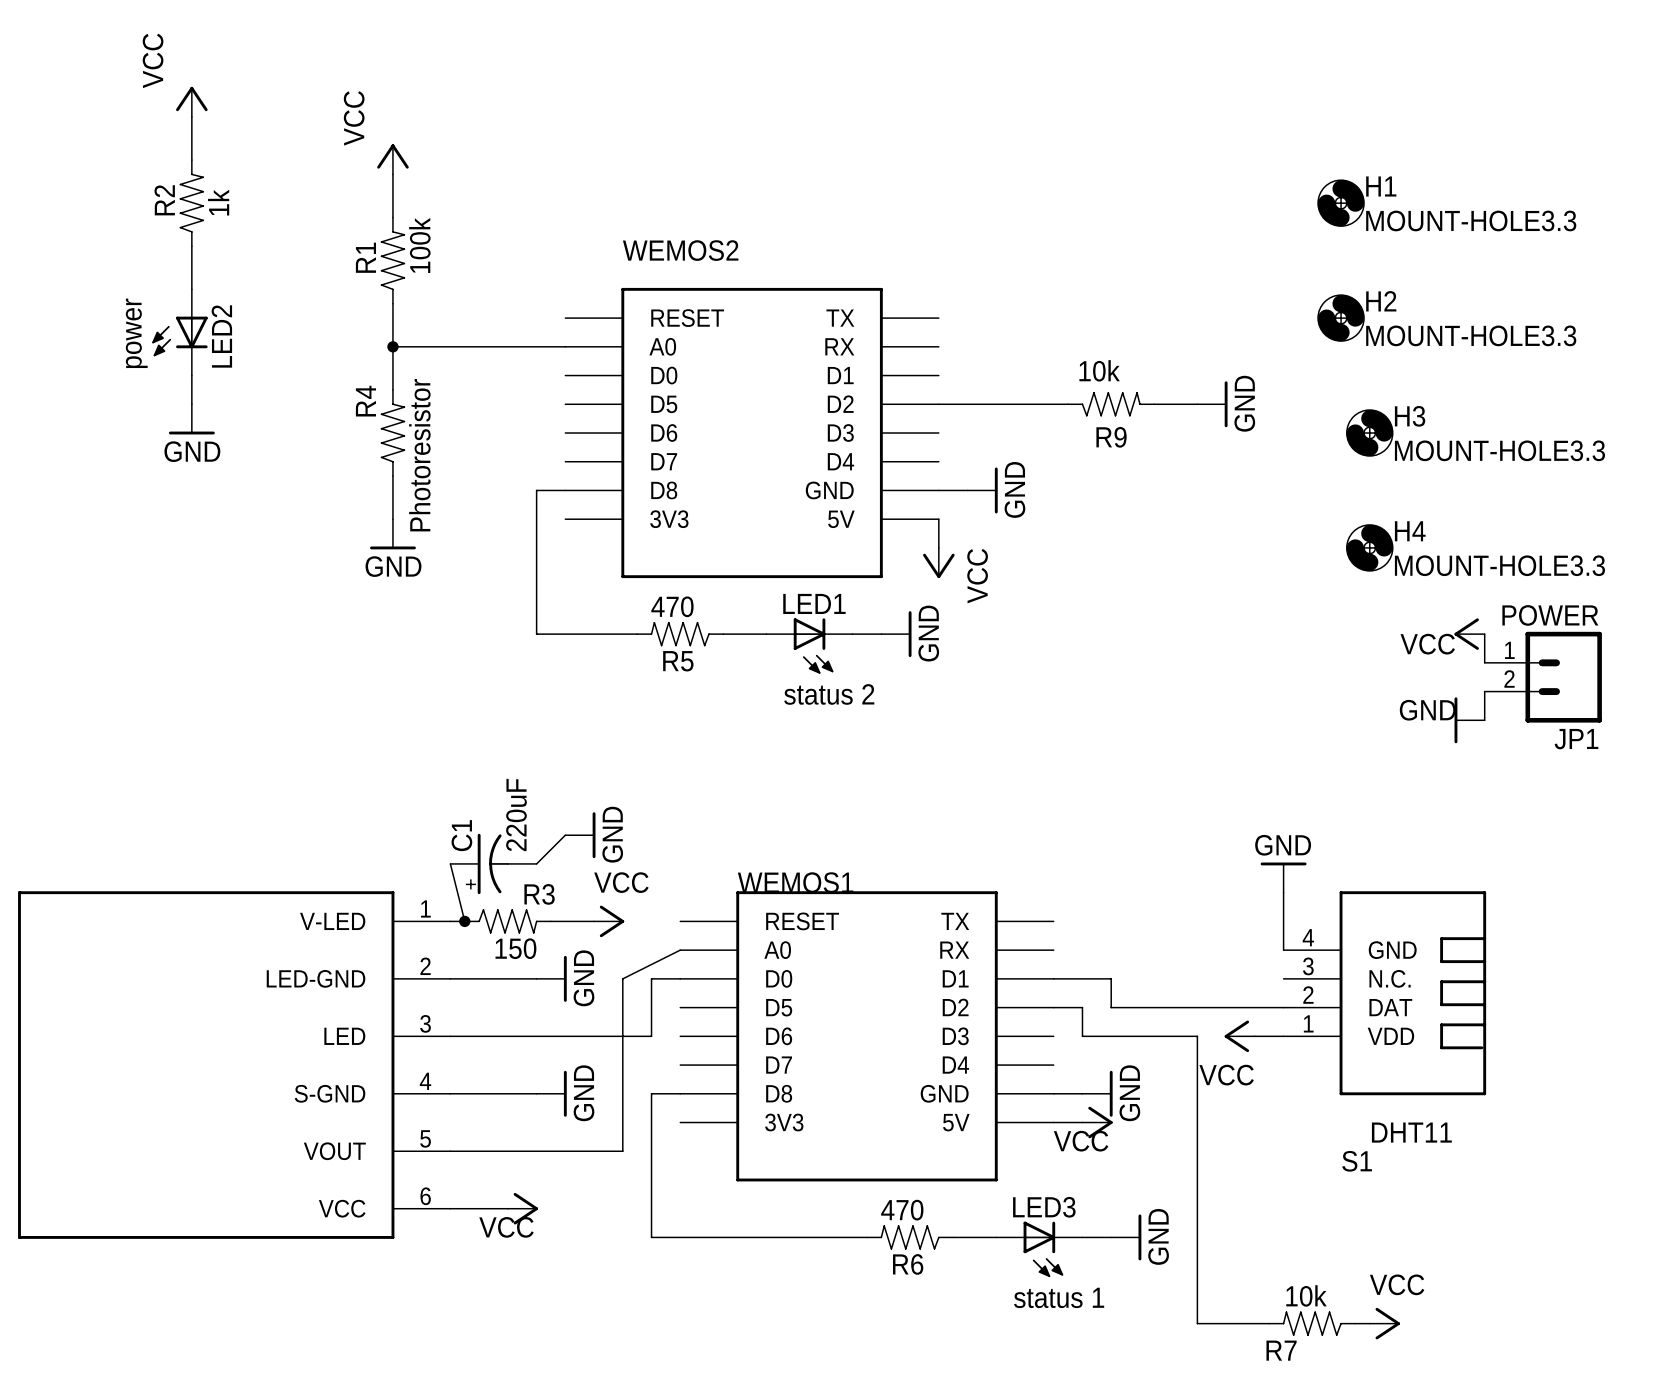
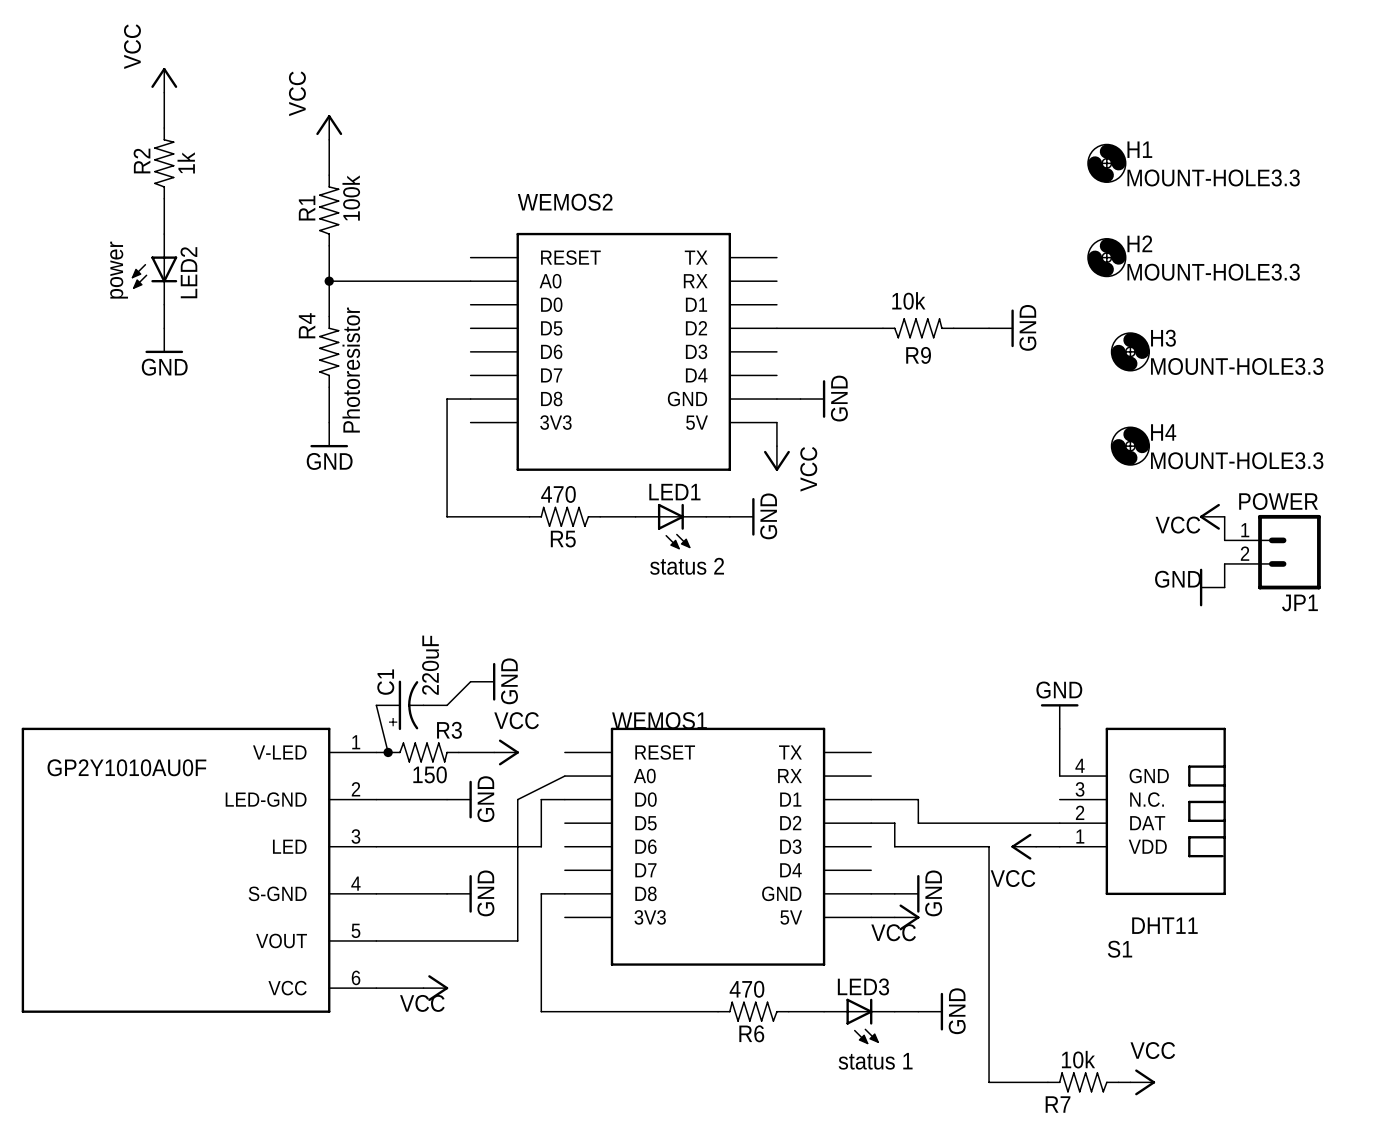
part text: none -> GP2Y1010AU0F (126, 767)

